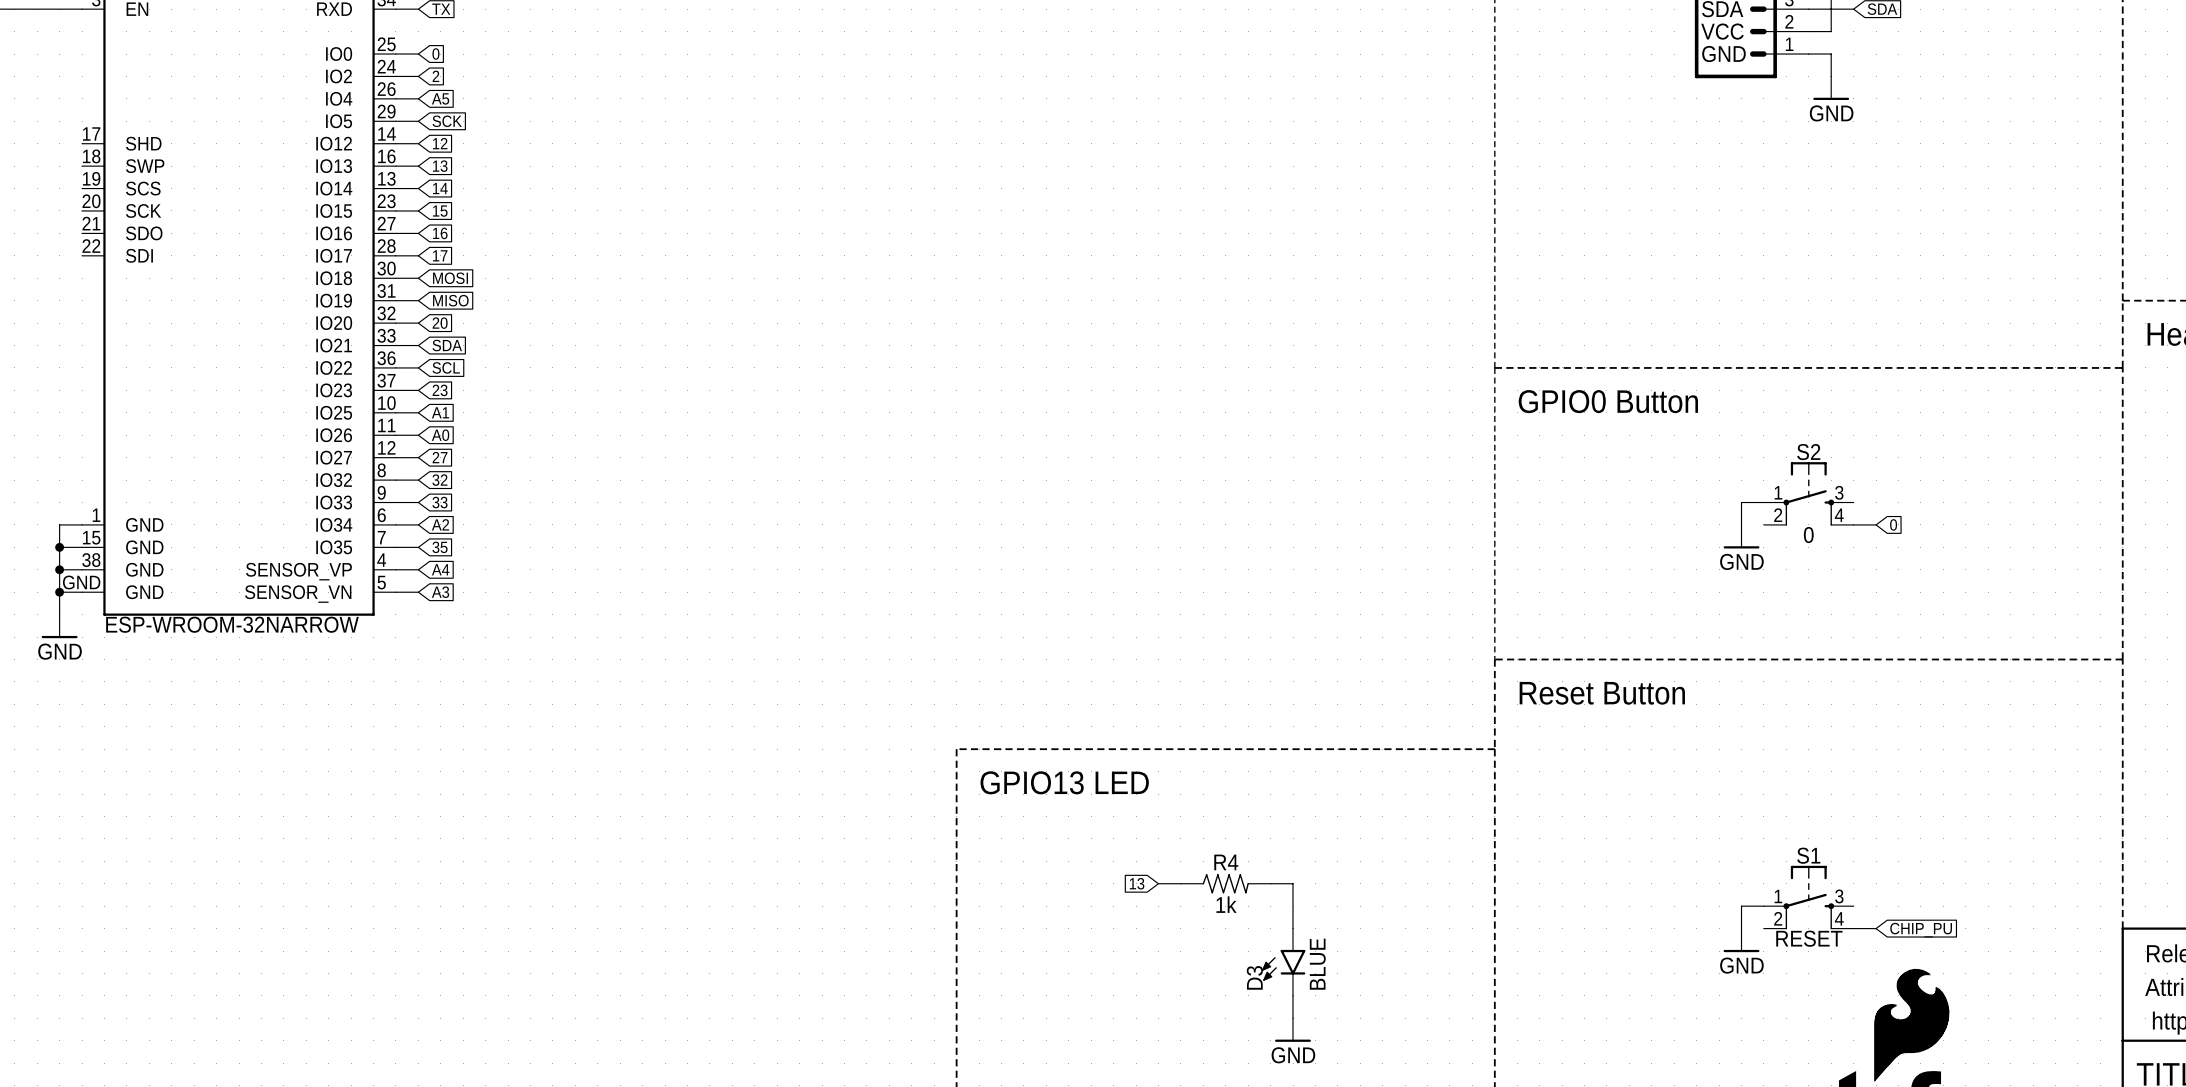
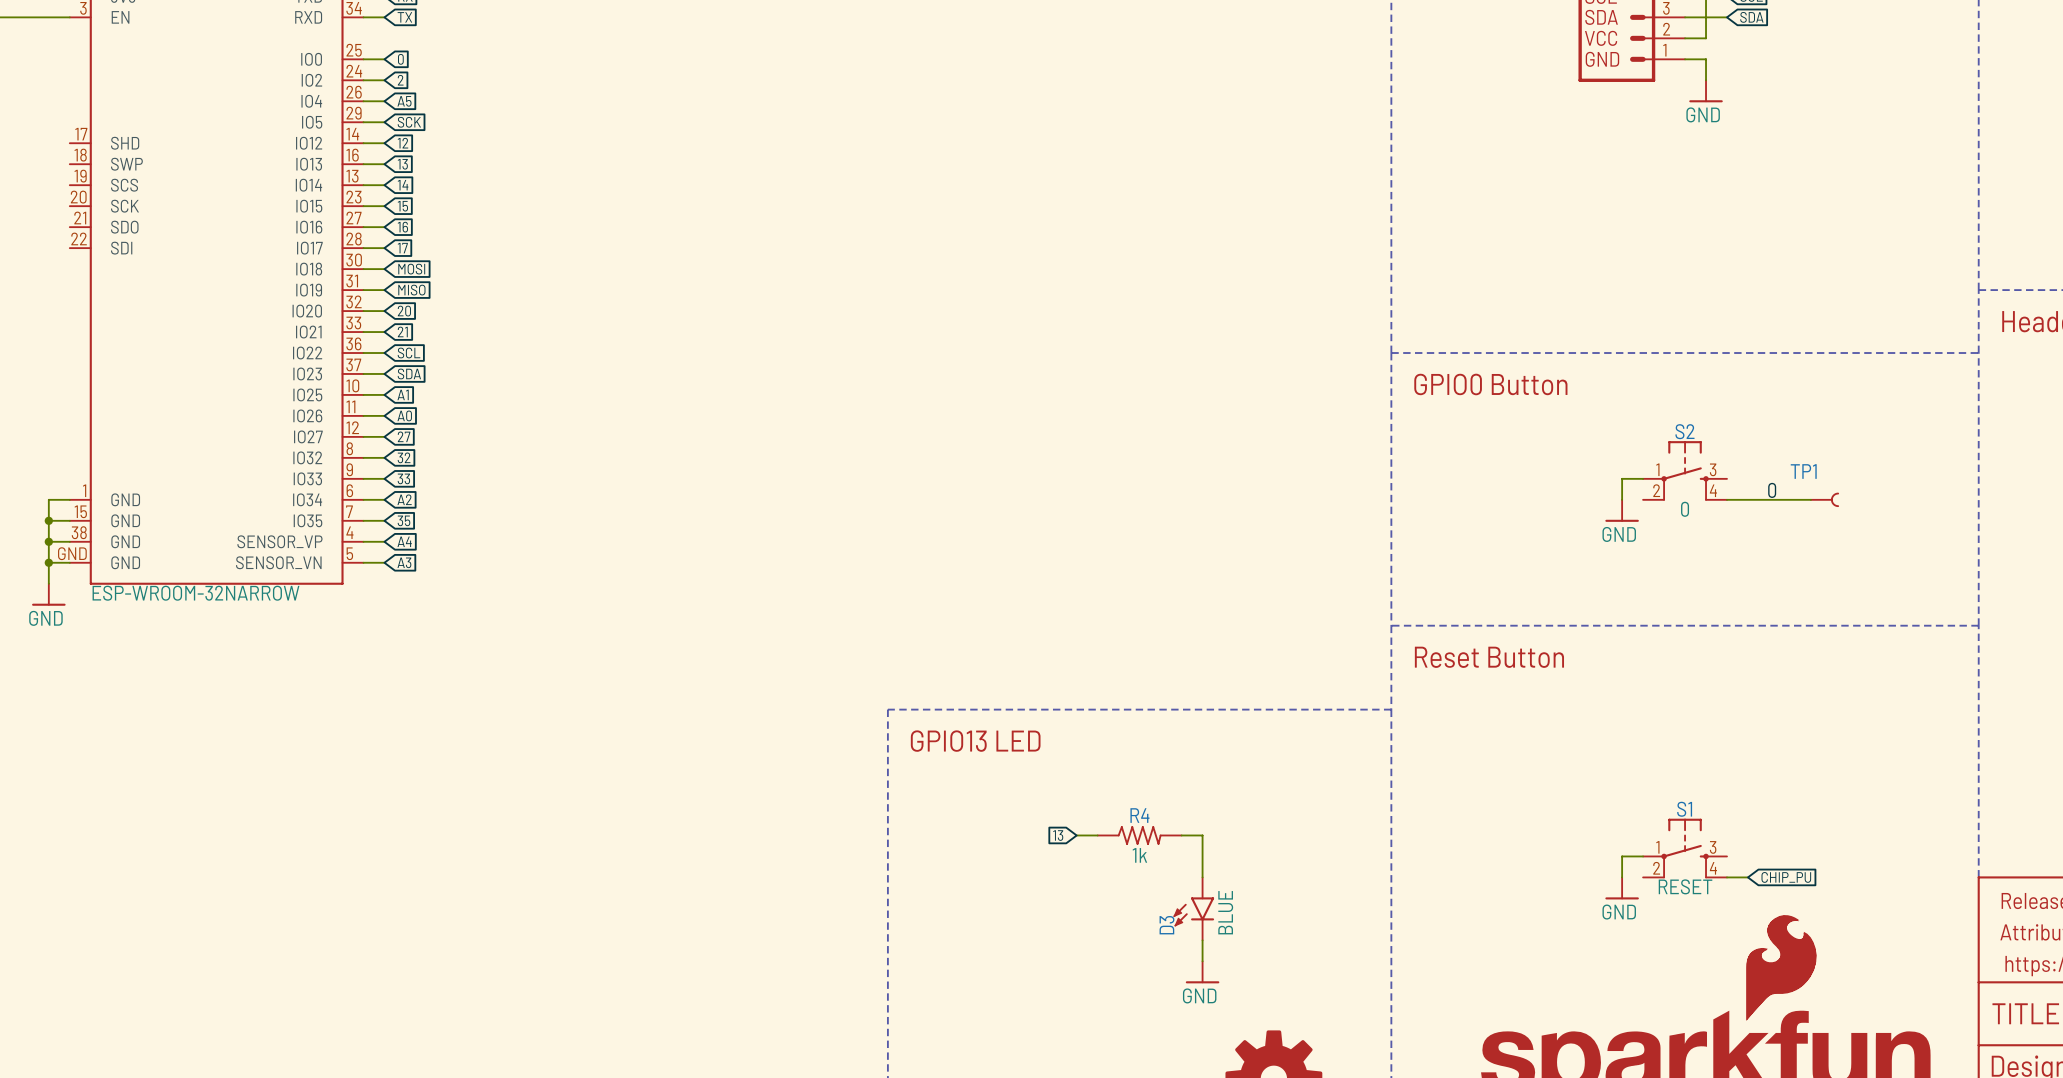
global label: SDA (447, 345) -> 21 (402, 331)
global label: 23 (440, 390) -> SDA (409, 373)
label: none -> 0 (1772, 490)
wire: none -> (1747, 499) (1810, 499)
global label: 0 (1893, 524) -> none
TP1: none -> (1824, 499)

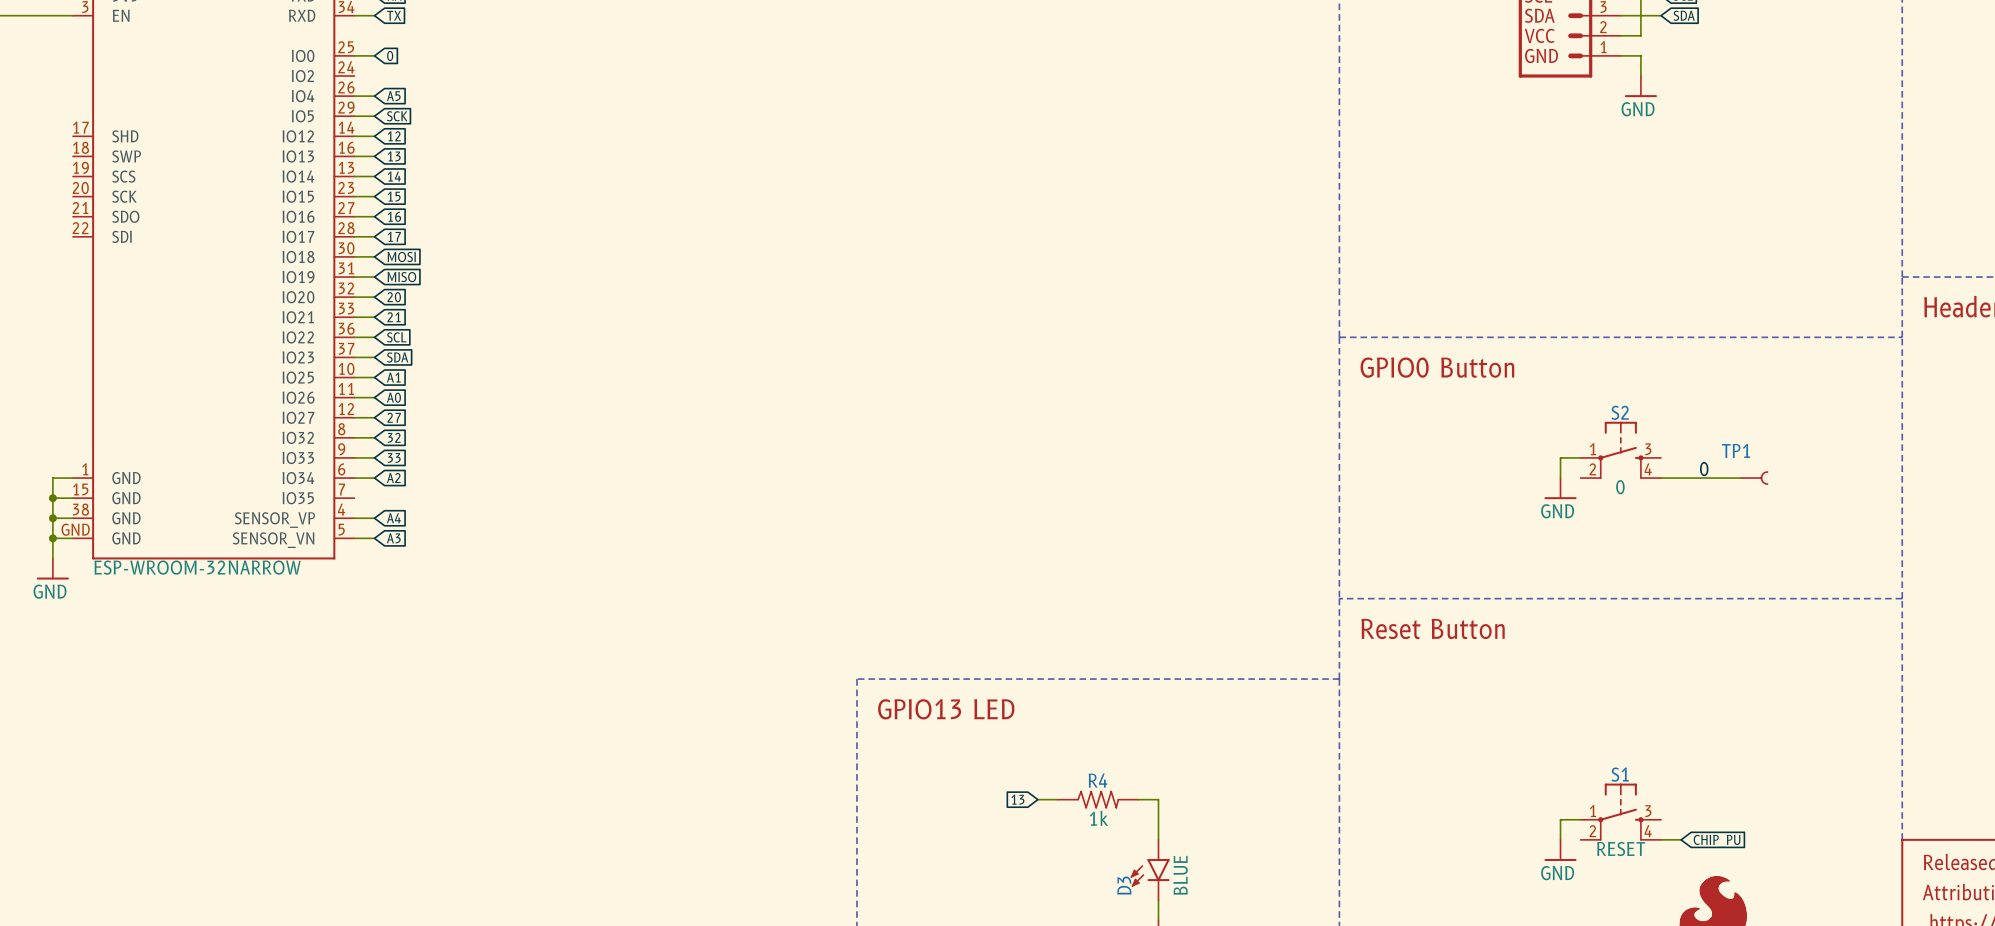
wire: (363, 80) (384, 80) -> none
global label: 2 (400, 80) -> none
wire: (363, 520) (384, 520) -> none
global label: 35 (403, 520) -> none

